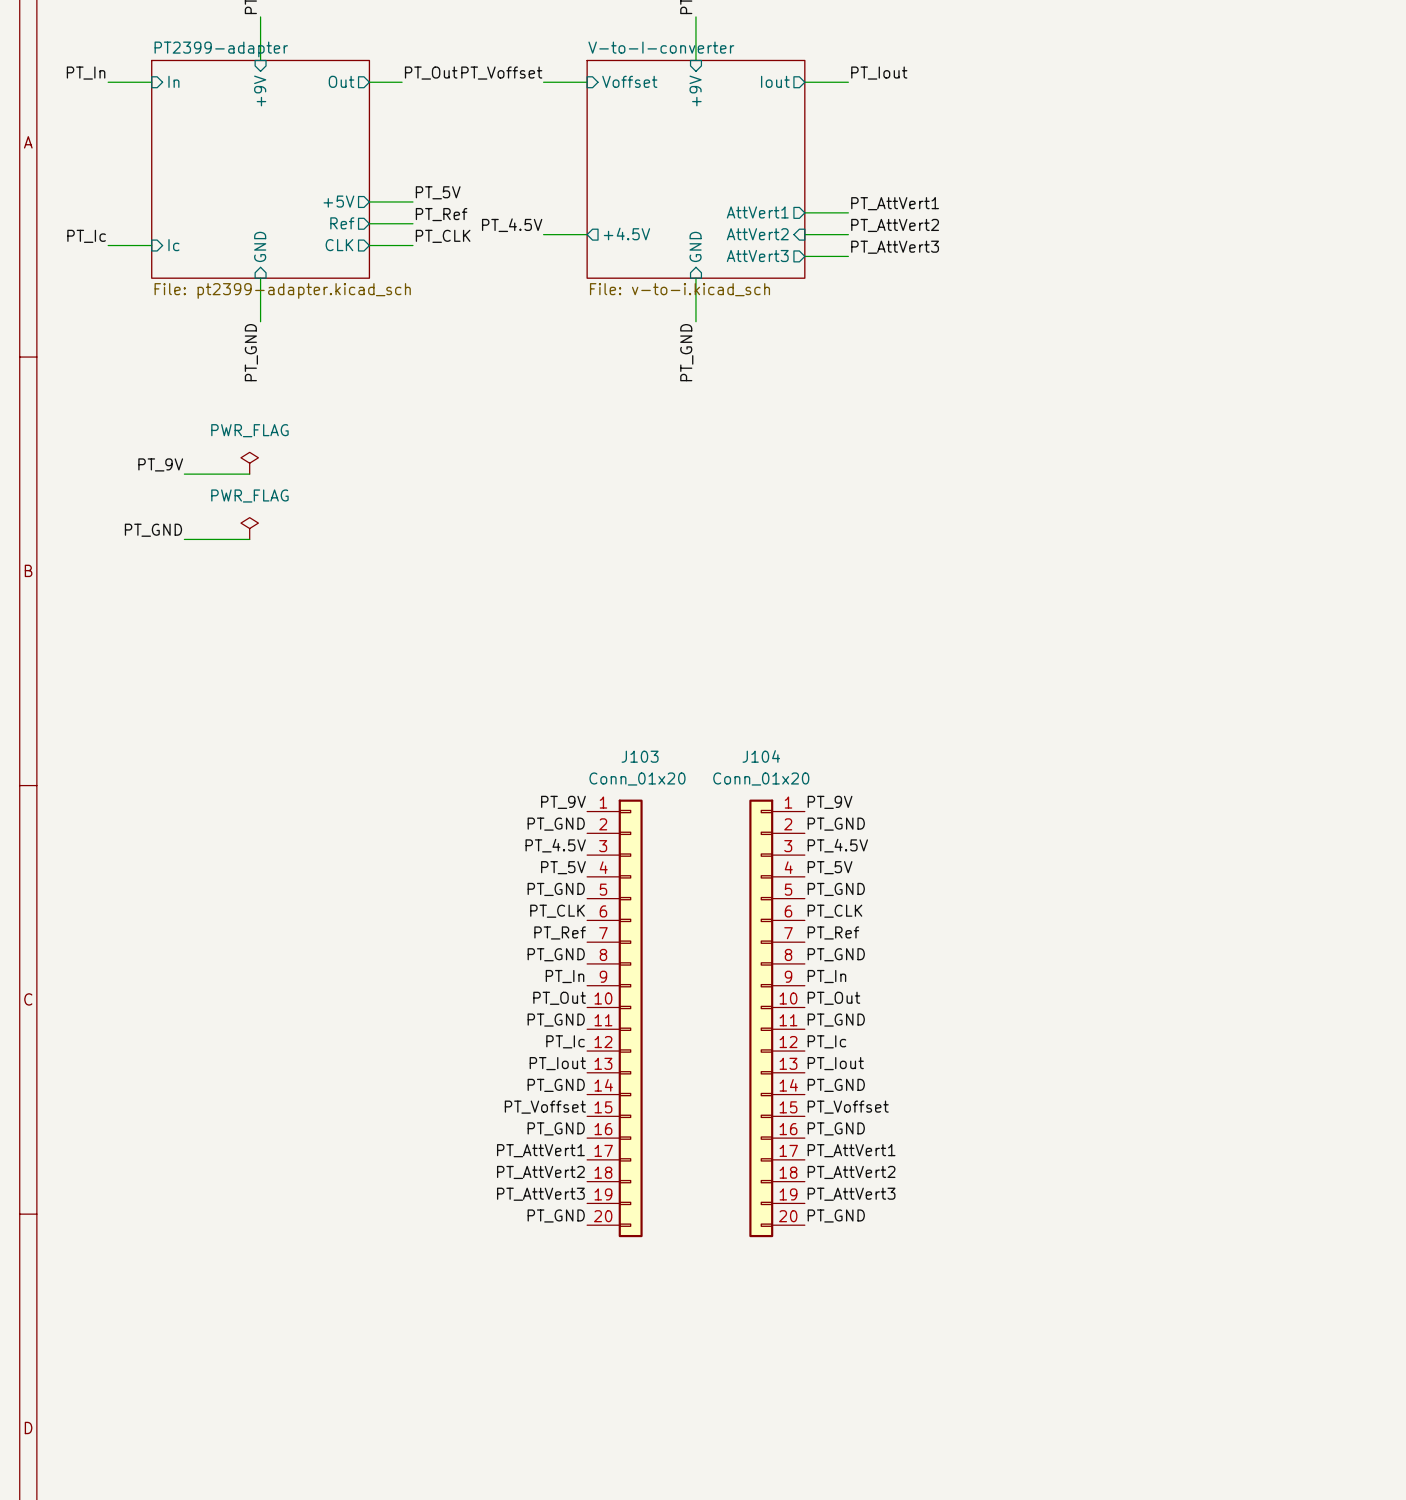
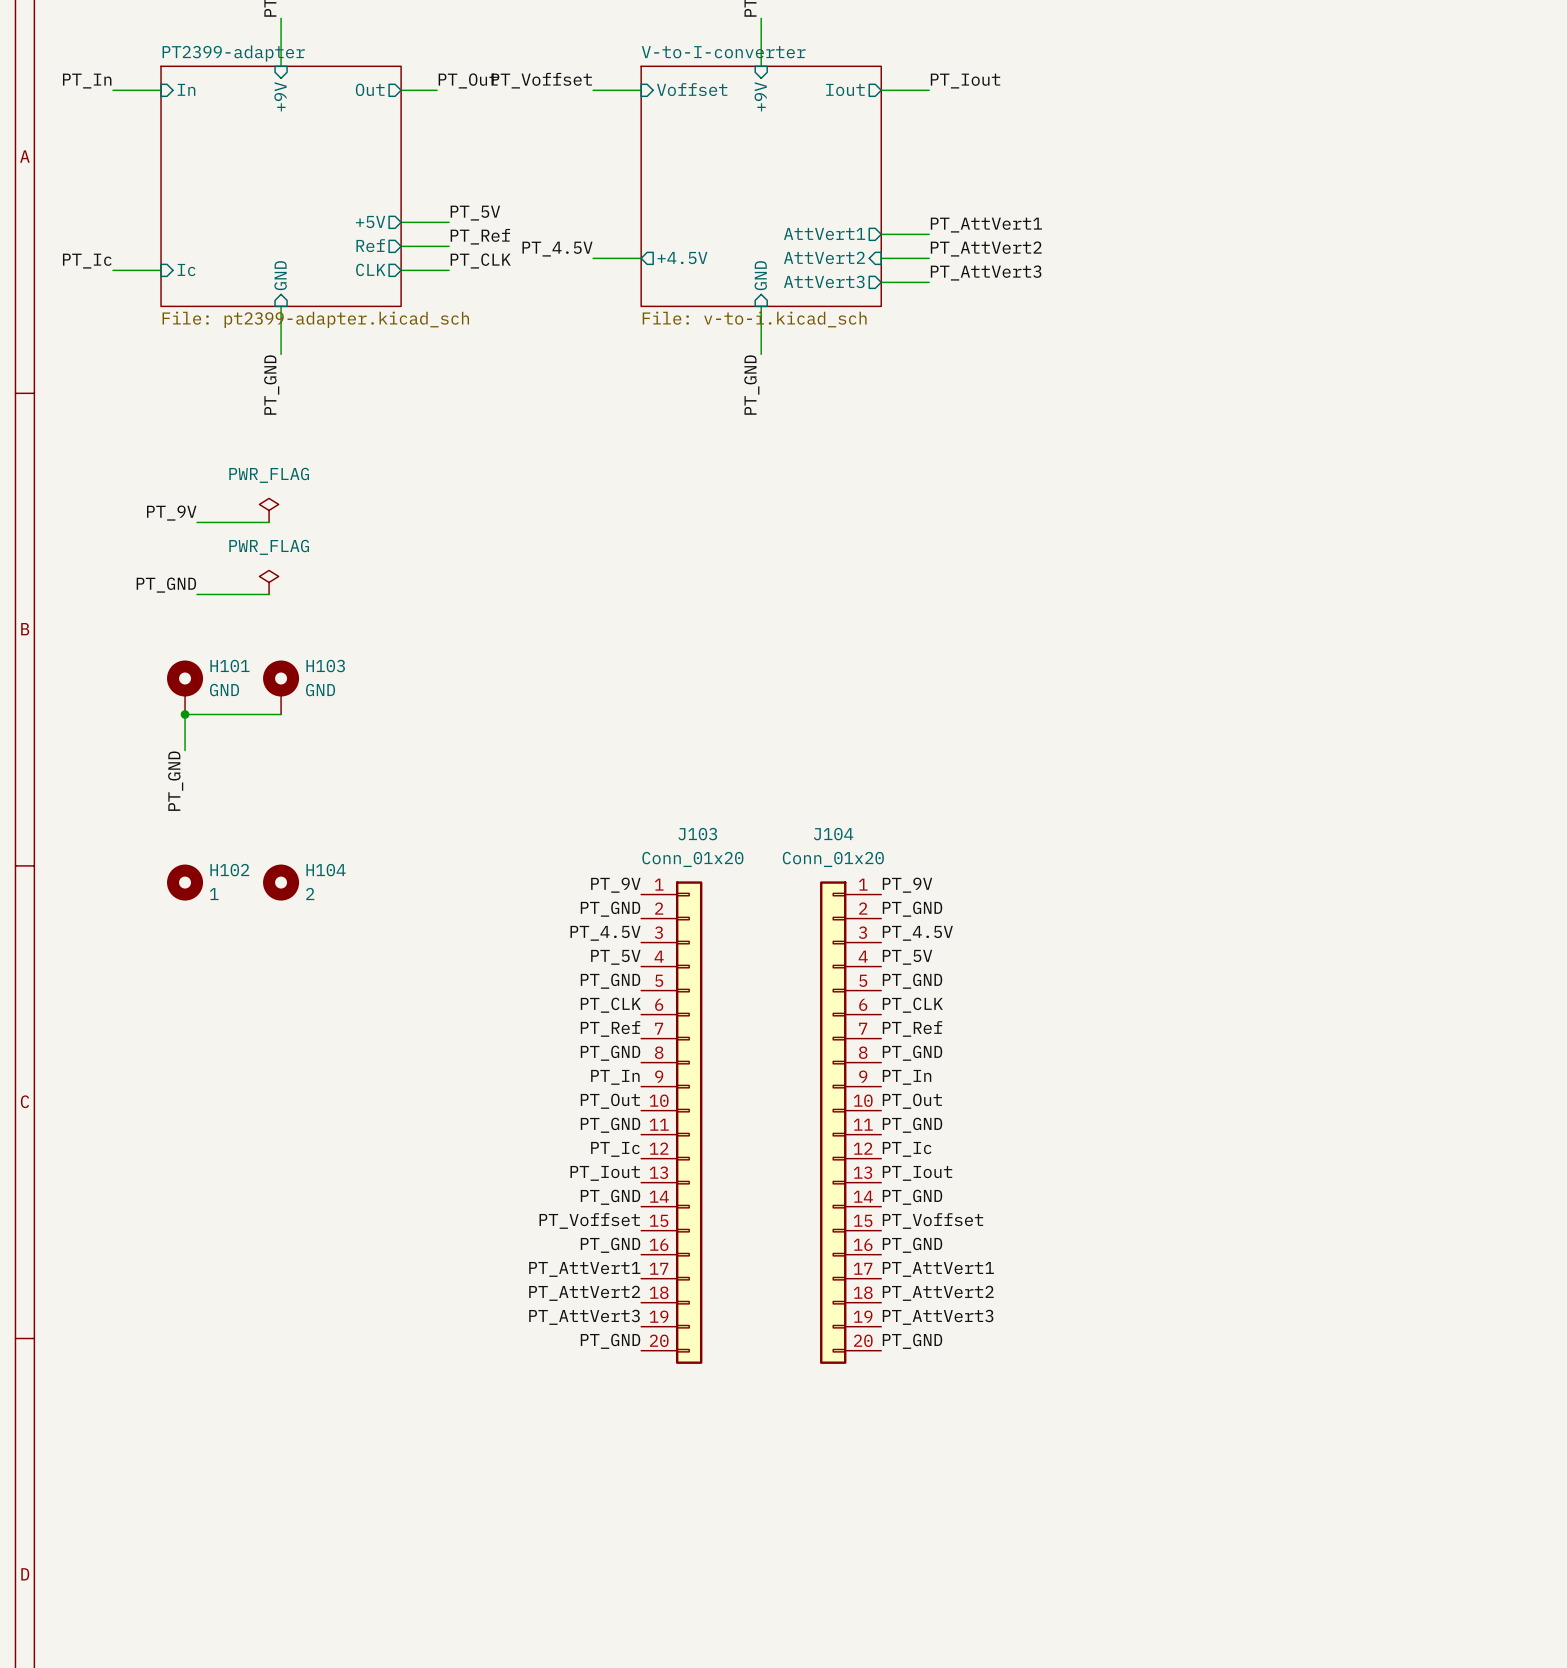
H101: none -> GND (185, 687)
H103: none -> GND (281, 687)
junction: none -> (185, 714)
wire: none -> (281, 714) (185, 714) (185, 750)
label: none -> PT_GND (175, 781)
H102: none -> 1 (185, 882)
H104: none -> 2 (281, 882)

